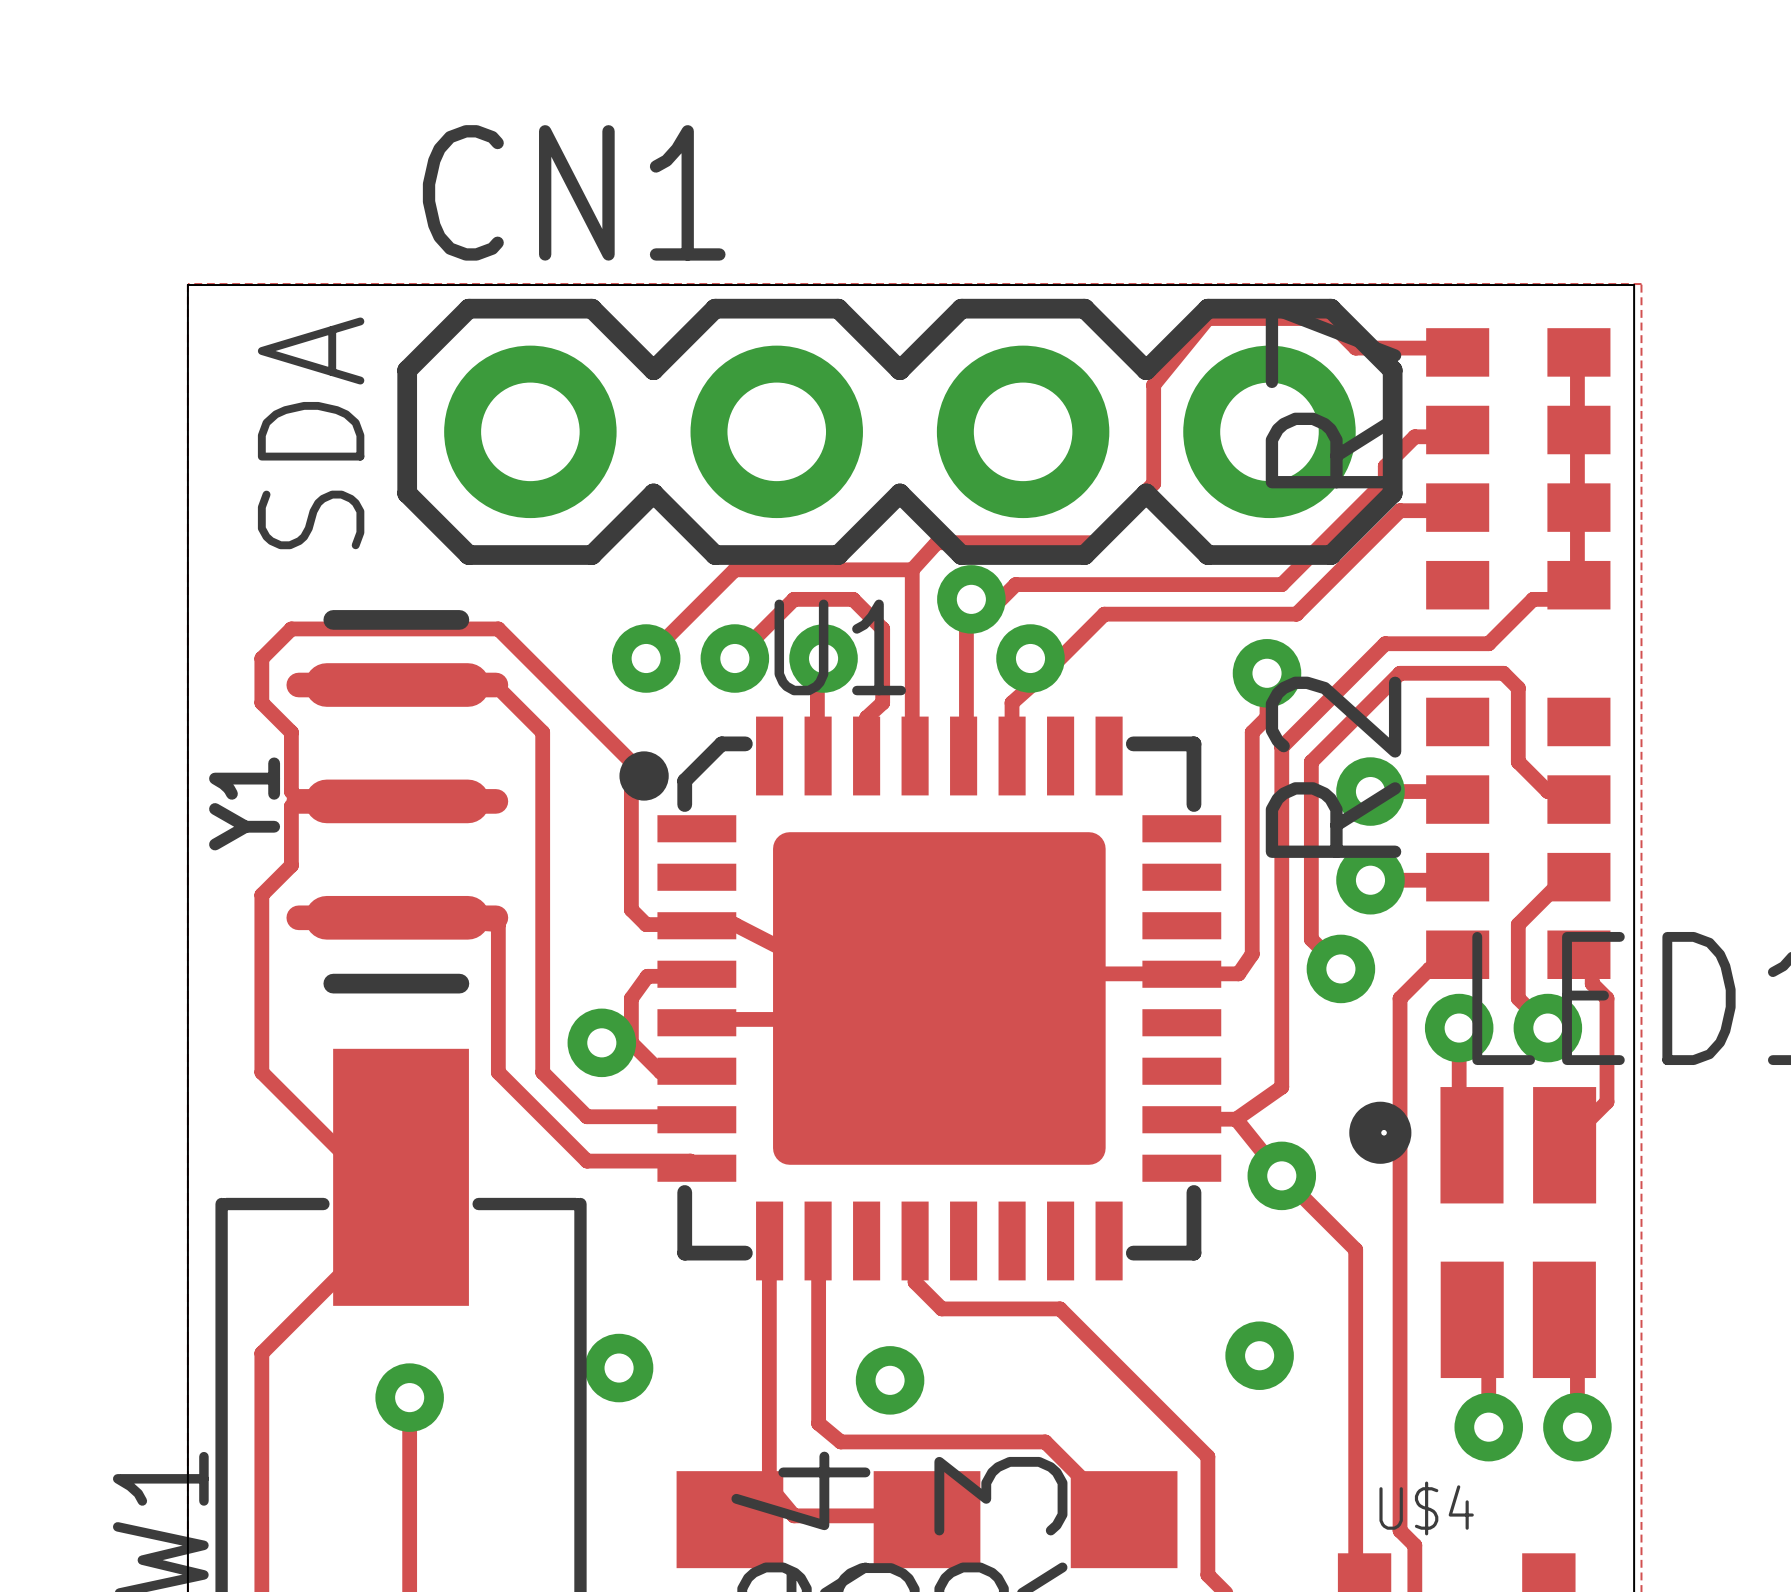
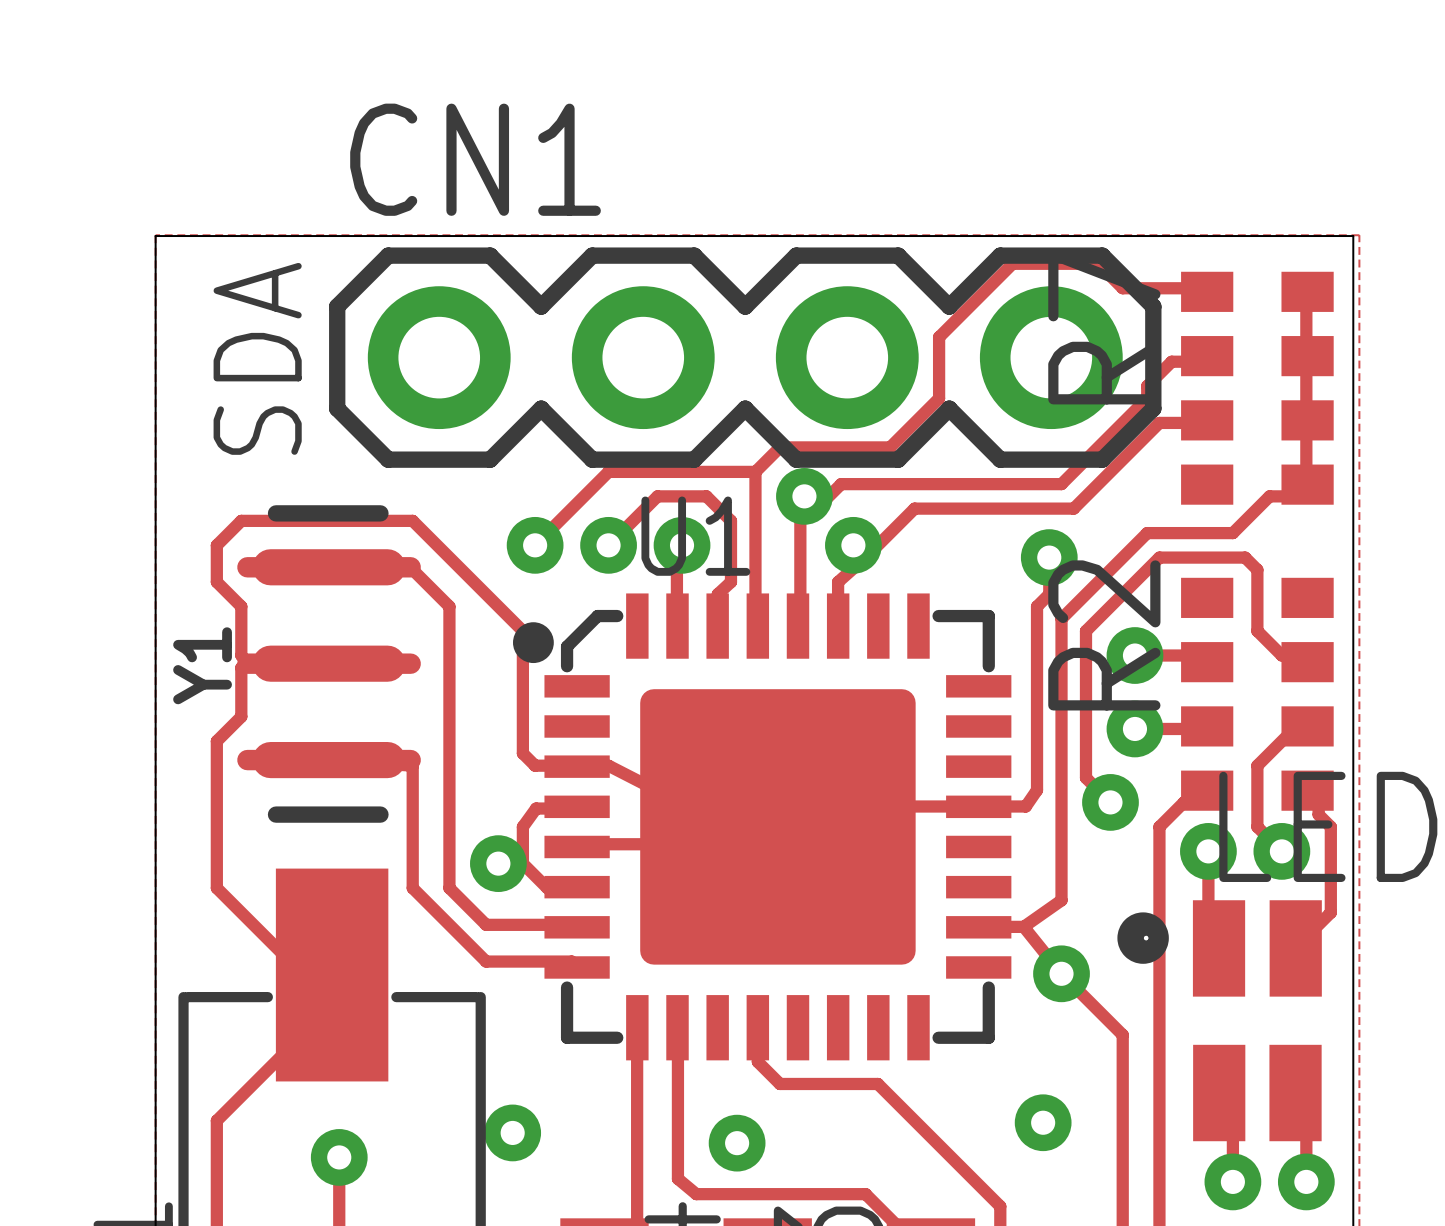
track: (1222, 318) (1207, 318) (1153, 385) (1153, 483) (1094, 542) (936, 542) (912, 569) -> (1012, 263) (939, 337) (939, 398) (890, 447) (779, 447) (755, 471)

